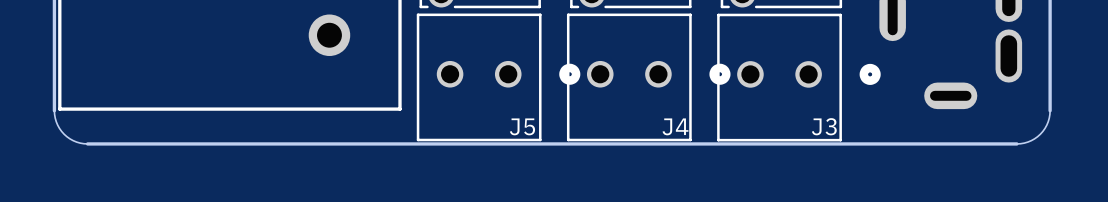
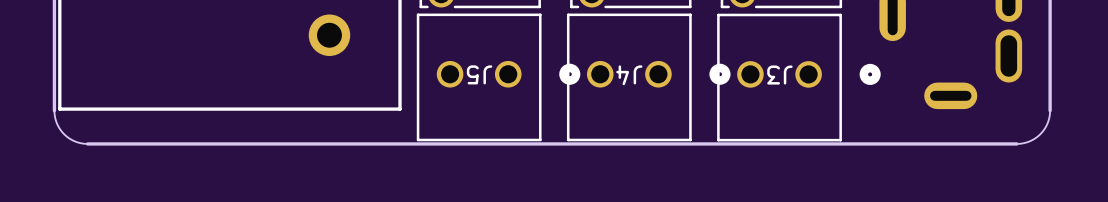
J5 name rotation: 0° (522, 126) -> 180° (479, 74)
J5 name position: J5 (522, 126) -> J5 (479, 74)
J4 name rotation: 0° (675, 126) -> 180° (629, 75)
J4 name position: J4 (675, 126) -> J4 (629, 75)
J3 name rotation: 0° (824, 126) -> 180° (779, 75)
J3 name position: J3 (824, 126) -> J3 (779, 75)

